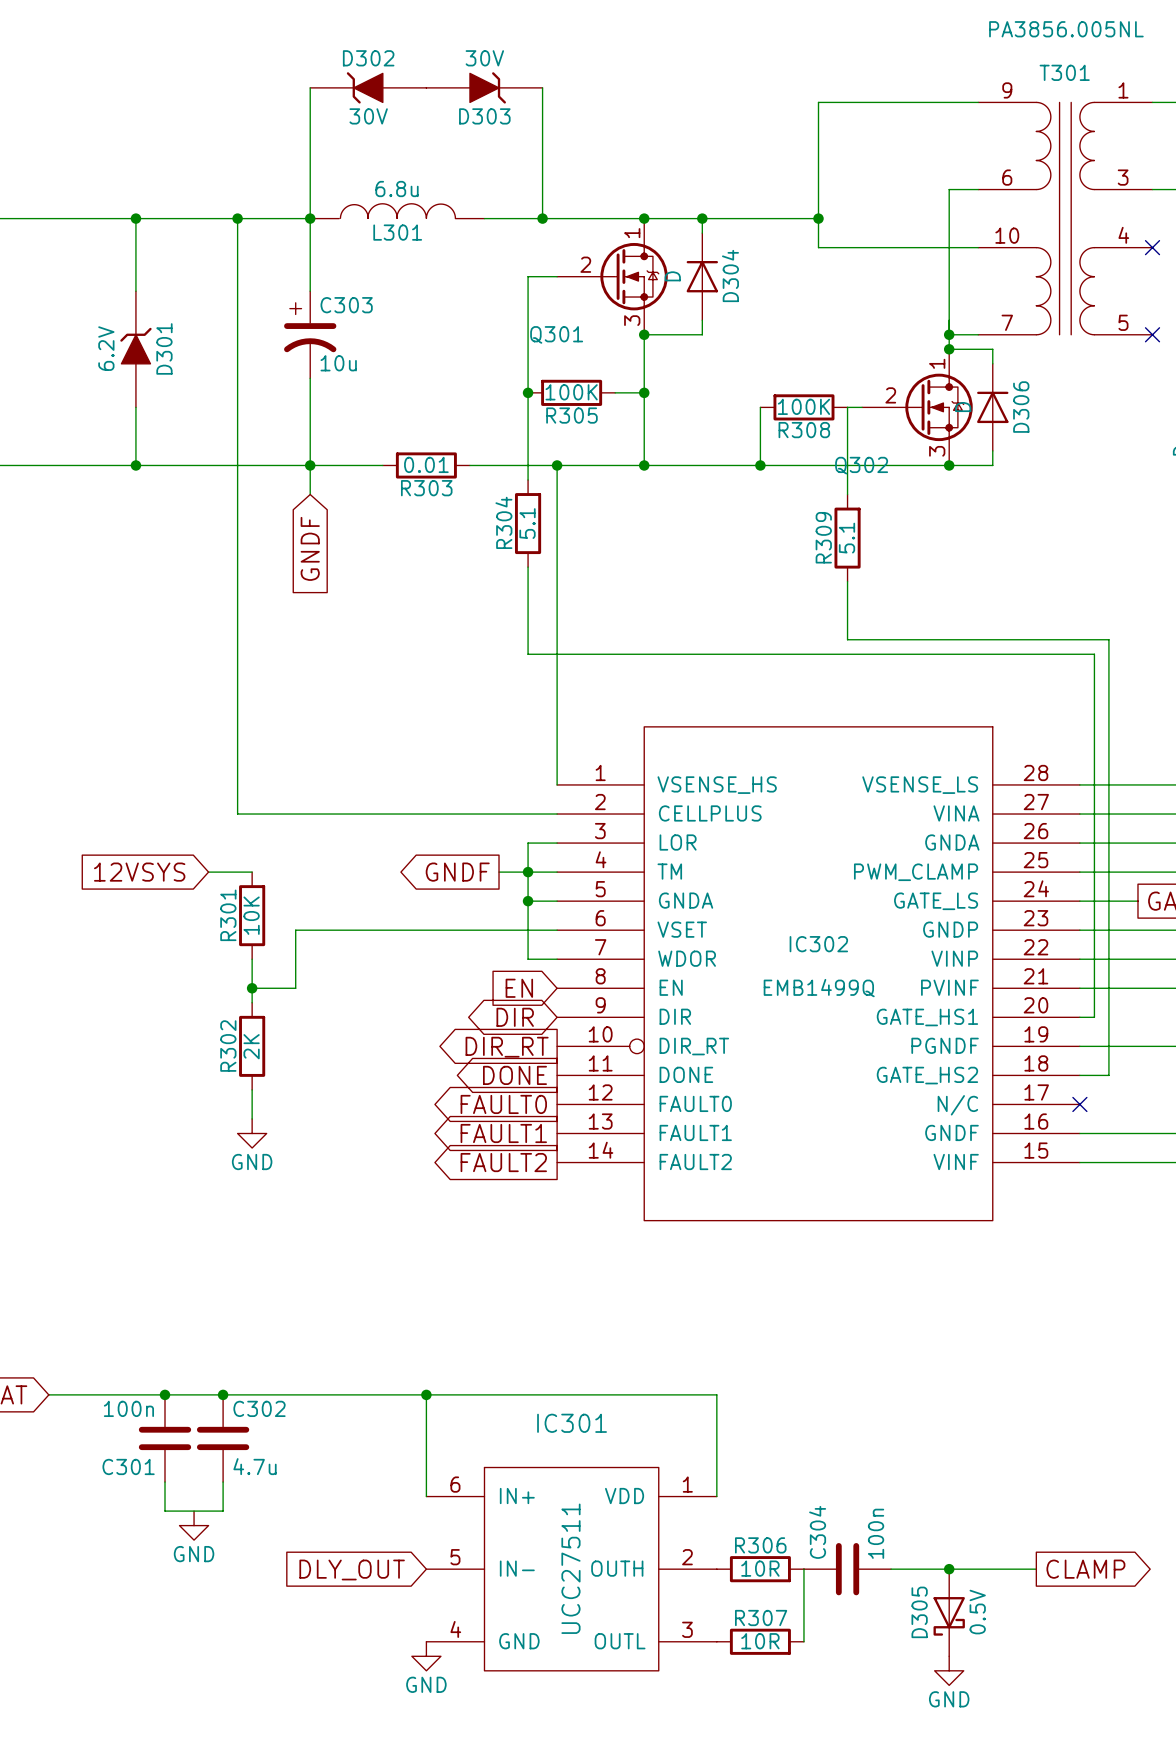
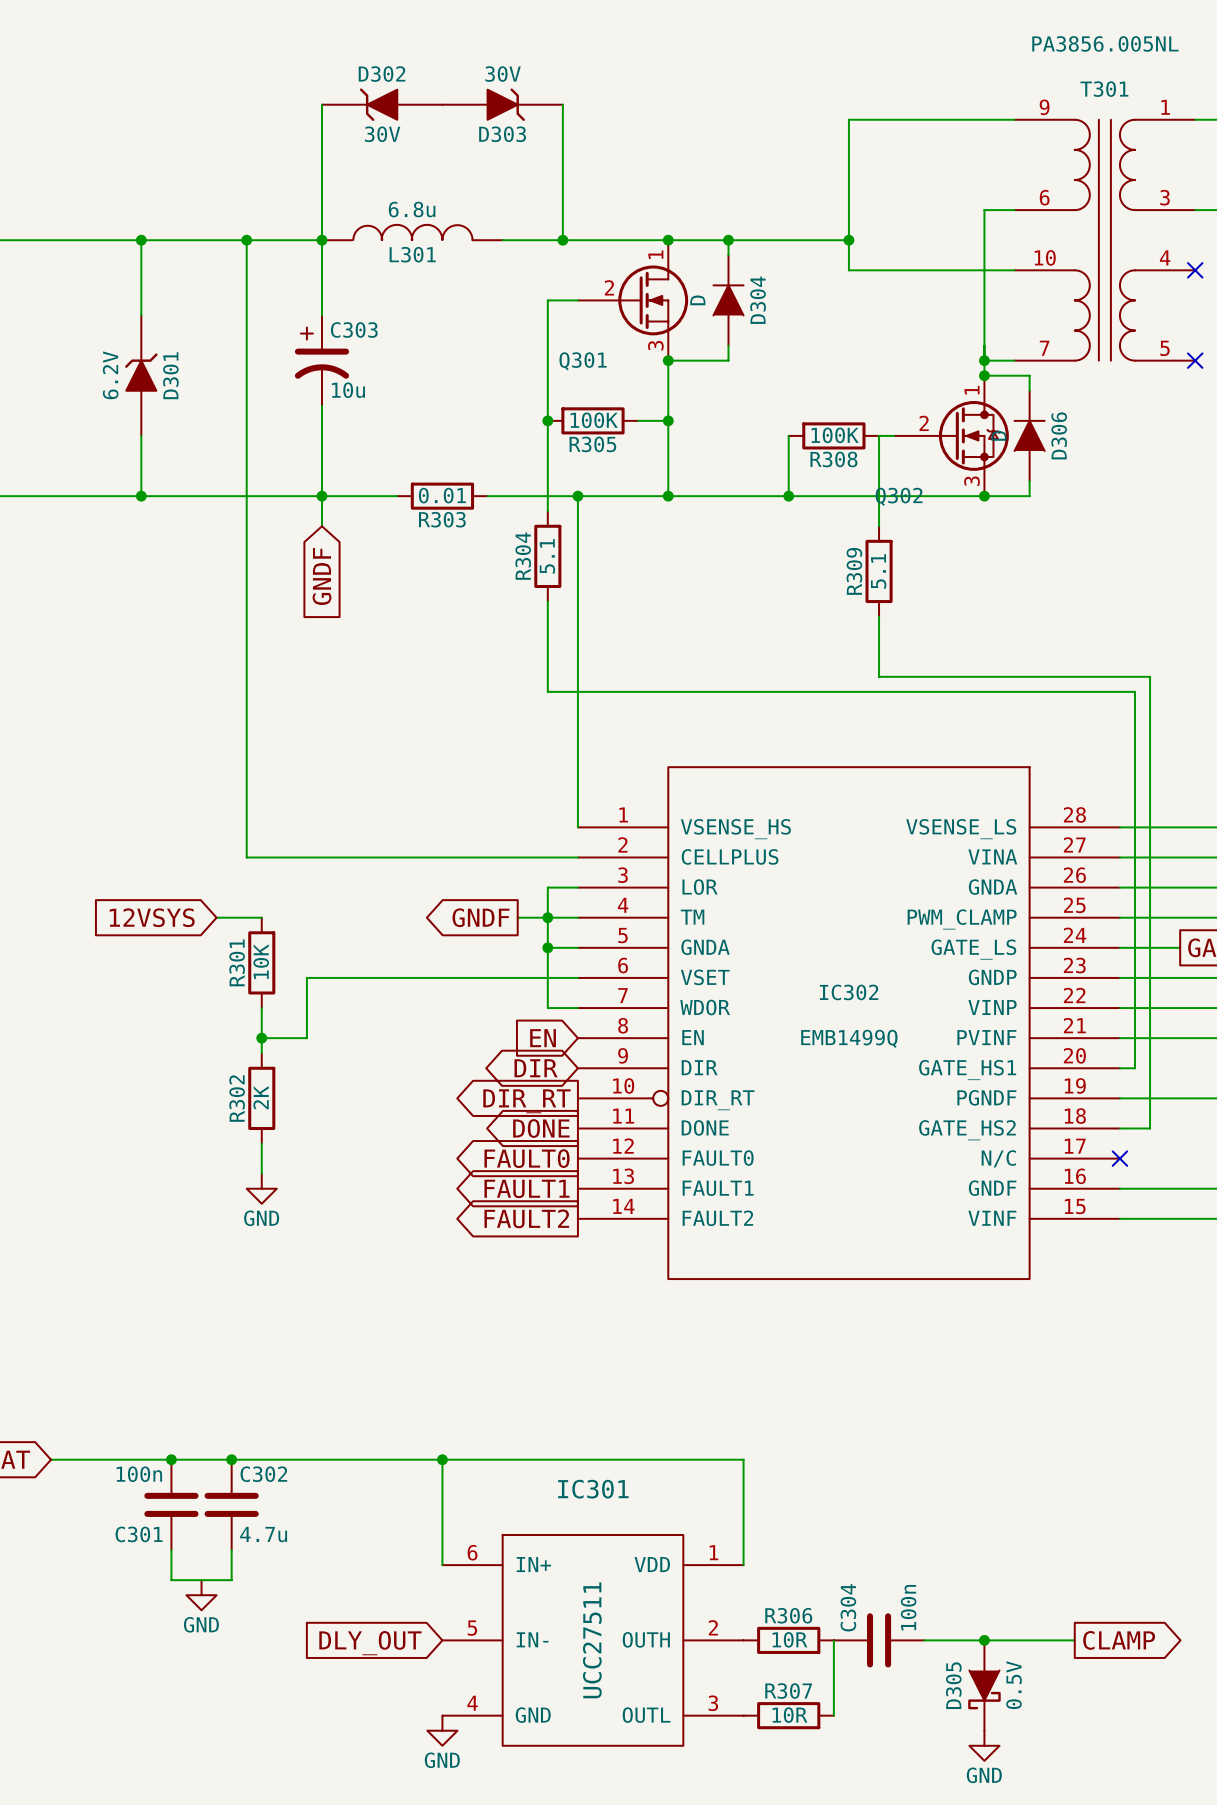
Q301 symbol: [557, 218, 668, 335] -> [577, 240, 689, 361]
D304 symbol: [686, 233, 719, 321] -> [712, 255, 745, 346]
D306 symbol: [977, 363, 1009, 451] -> [1013, 390, 1046, 482]
D305 symbol: [933, 1569, 965, 1657] -> [968, 1640, 1001, 1731]

